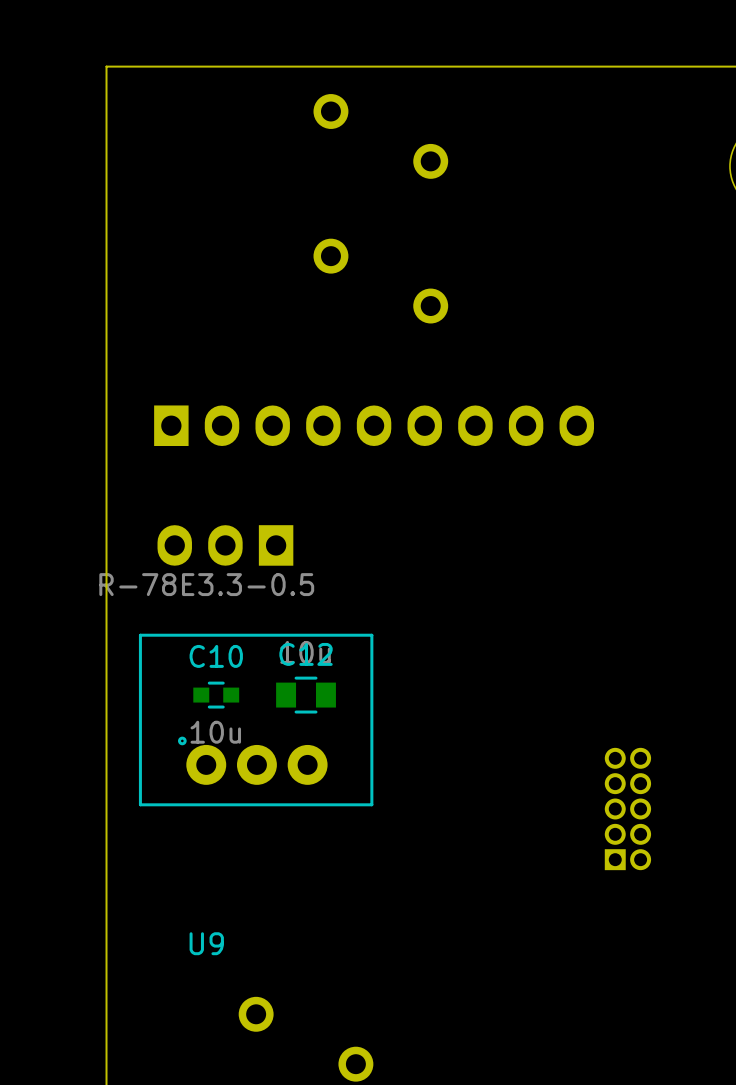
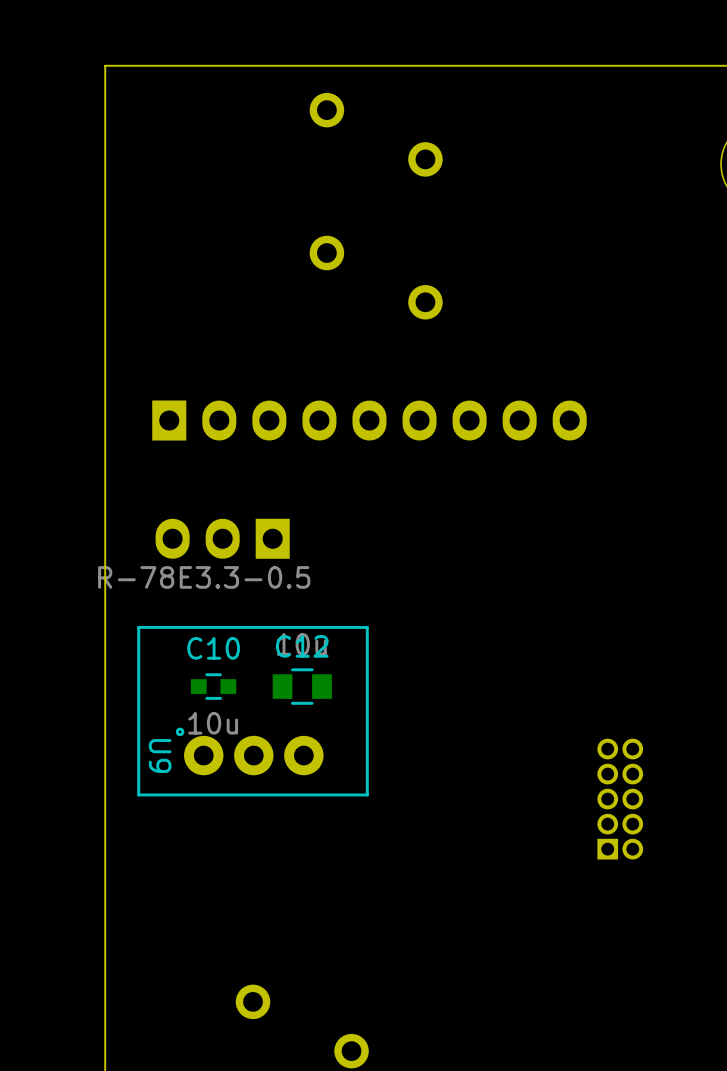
U9 name rotation: 0° (206, 943) -> 90° clockwise (160, 756)
U9 name position: U9 (206, 943) -> U9 (160, 756)

